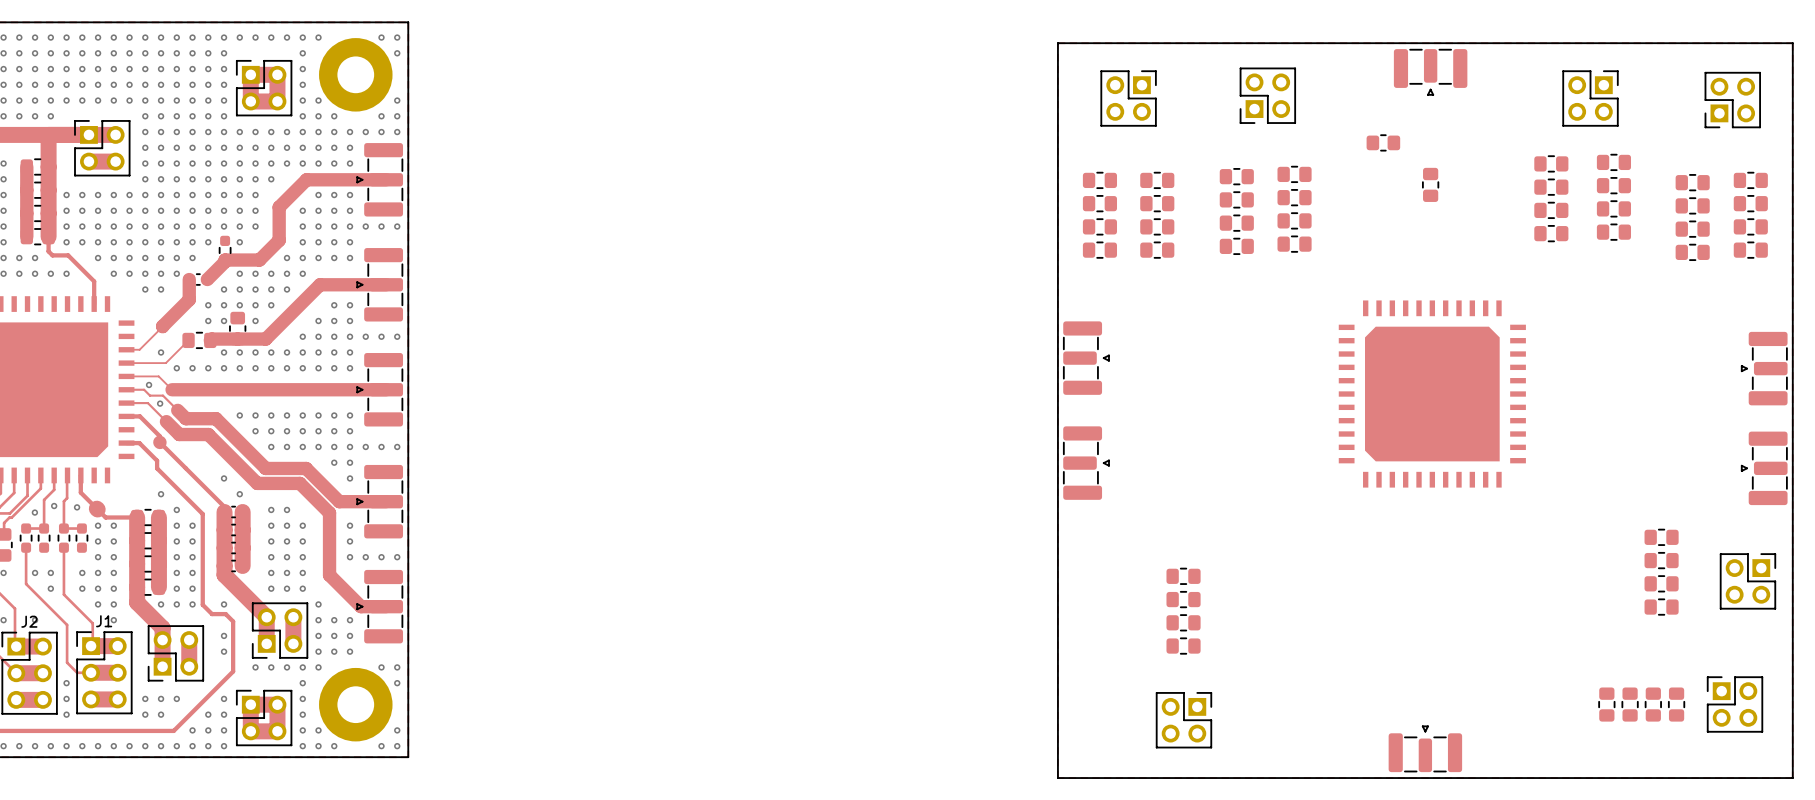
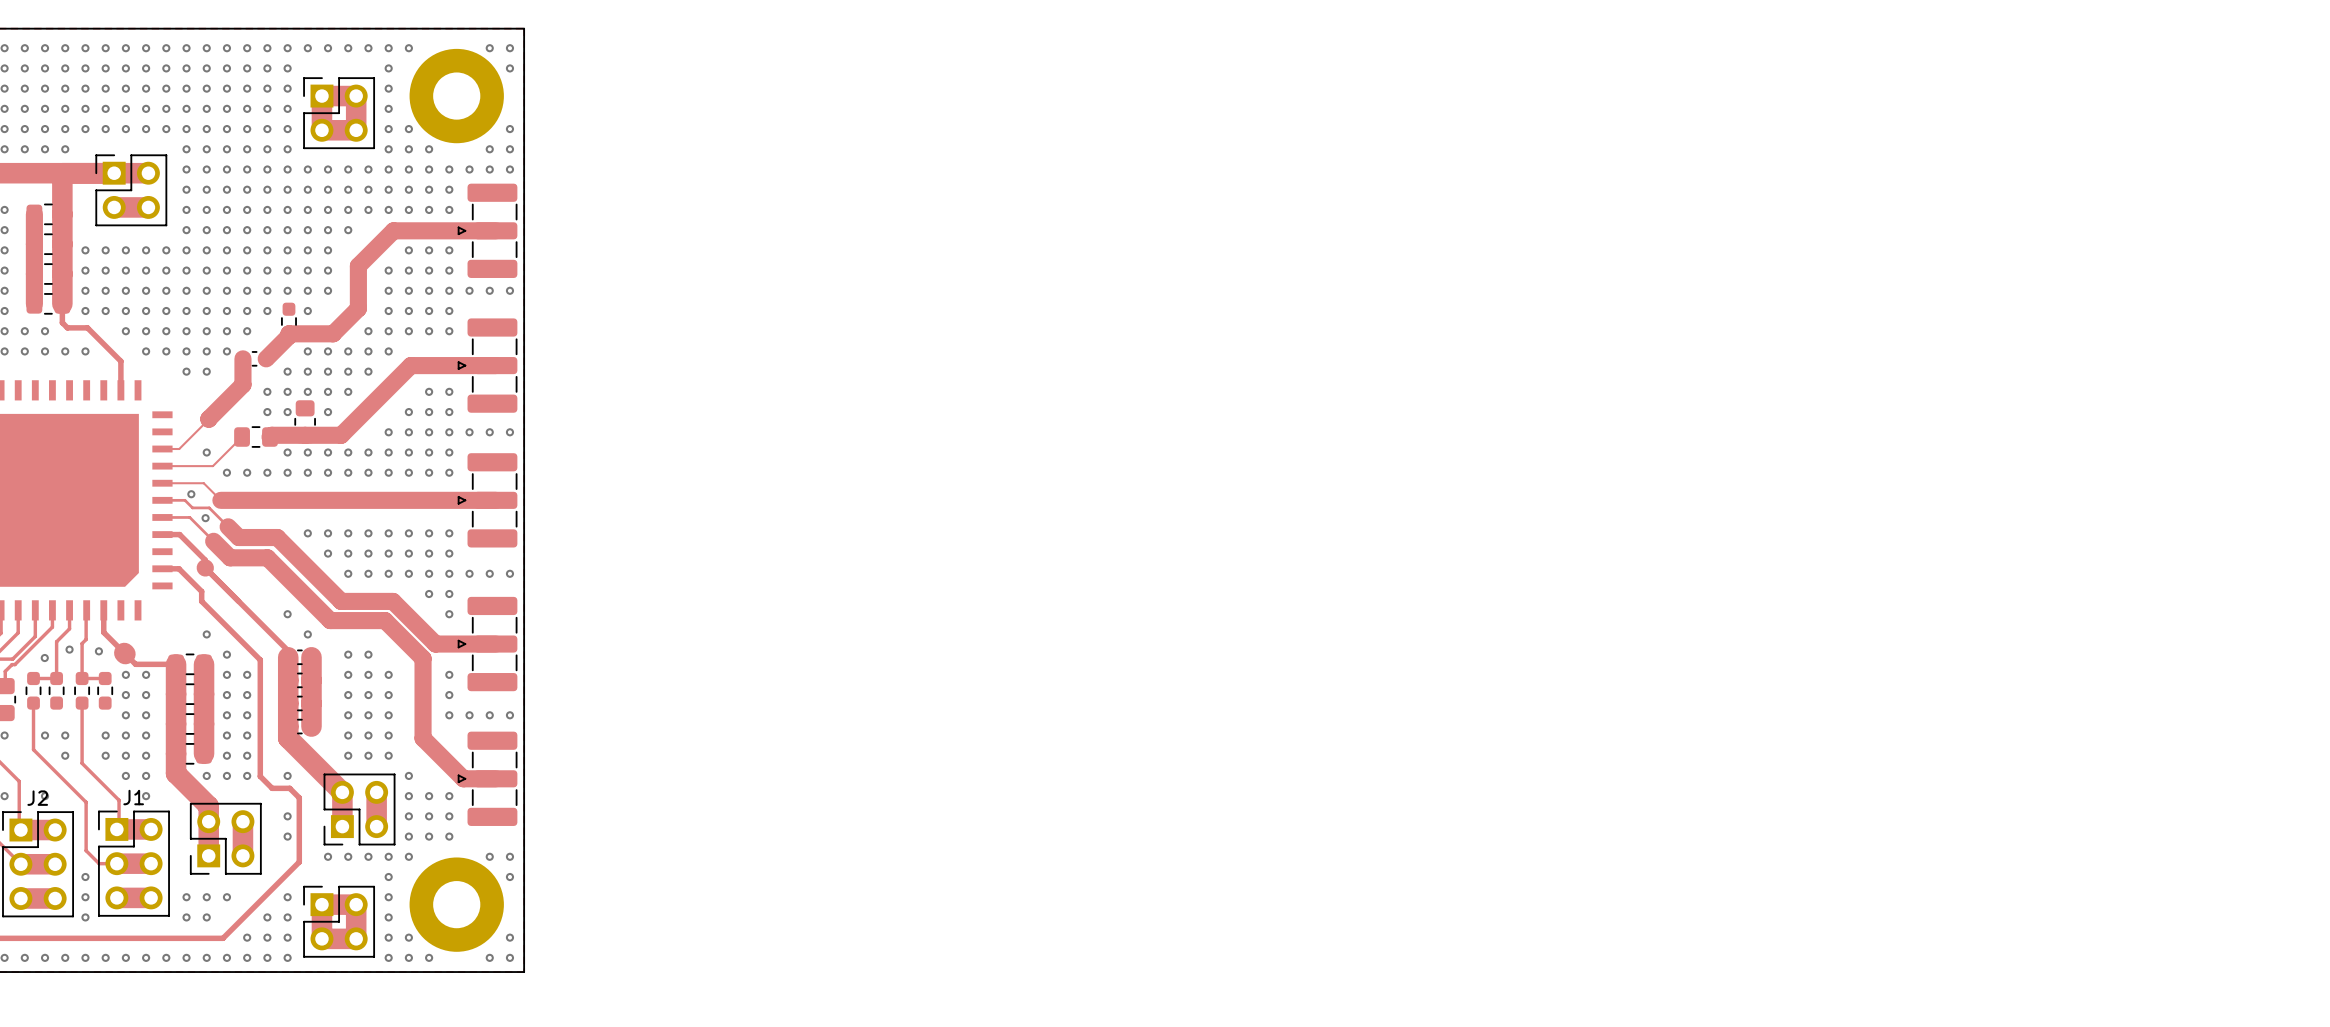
board edge: (1057, 43) (1792, 43) (1792, 778) (1057, 778) (1057, 43) -> none
part: (1430, 72) -> none
part: (1267, 95) -> none
part: (1128, 98) -> none
part: (1590, 98) -> none
part: (1732, 100) -> none
part: (1383, 142) -> none
part: (1613, 162) -> none
part: (1551, 163) -> none
part: (1294, 174) -> none
part: (1236, 176) -> none
part: (1099, 180) -> none
part: (1157, 180) -> none
part: (1750, 180) -> none
part: (1692, 182) -> none
part: (1430, 184) -> none
part: (1613, 185) -> none
part: (1551, 187) -> none
part: (1294, 197) -> none
part: (1236, 199) -> none
part: (1099, 203) -> none
part: (1157, 203) -> none
part: (1750, 203) -> none
part: (1692, 205) -> none
part: (1613, 208) -> none
part: (1551, 210) -> none
part: (1294, 220) -> none
part: (1236, 223) -> none
part: (1099, 226) -> none
part: (1157, 226) -> none
part: (1750, 226) -> none
part: (1692, 229) -> none
part: (1613, 232) -> none
part: (1551, 233) -> none
part: (1294, 244) -> none
part: (1236, 246) -> none
part: (1099, 250) -> none
part: (1157, 250) -> none
part: (1750, 250) -> none
part: (1692, 252) -> none
part: (1086, 358) -> none
part: (1764, 368) -> none
part: (1432, 394) -> none
part: (1086, 463) -> none
part: (1764, 468) -> none
part: (1661, 537) -> none
part: (1661, 560) -> none
part: (1183, 576) -> none
part: (1747, 581) -> none
part: (1661, 583) -> none
part: (1183, 599) -> none
part: (1661, 607) -> none
part: (1183, 622) -> none
part: (1183, 646) -> none
part: (1606, 704) -> none
part: (1630, 704) -> none
part: (1653, 704) -> none
part: (1676, 704) -> none
part: (1735, 704) -> none
part: (1183, 720) -> none
part: (1425, 748) -> none

